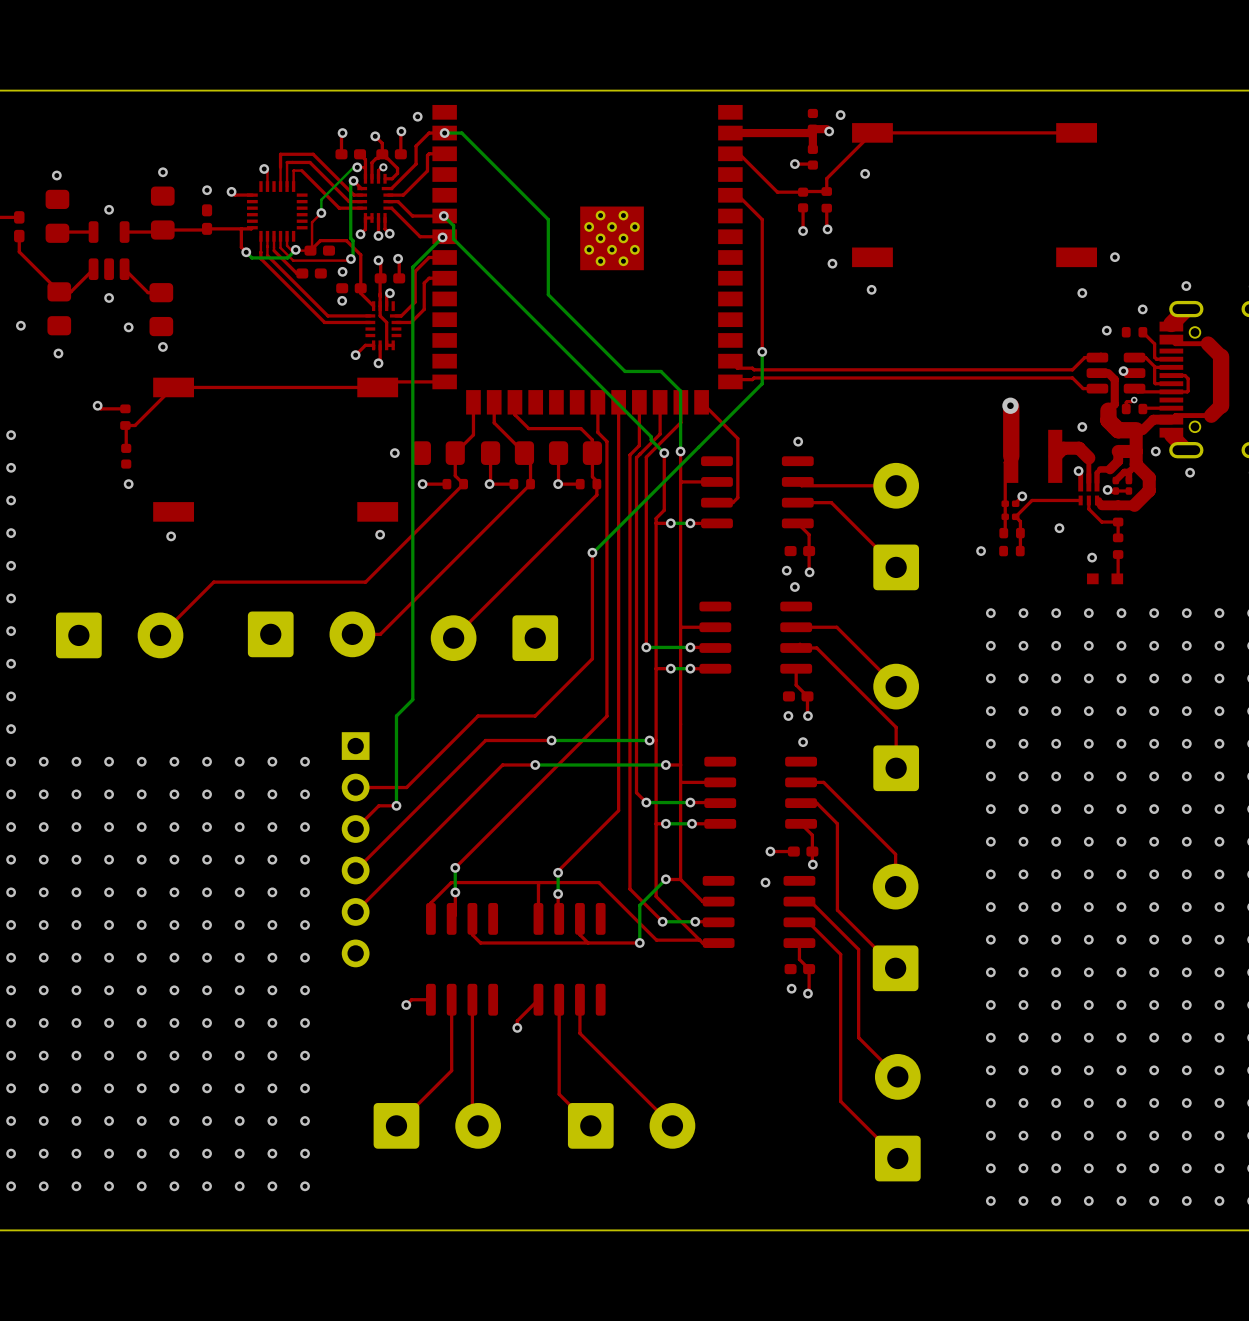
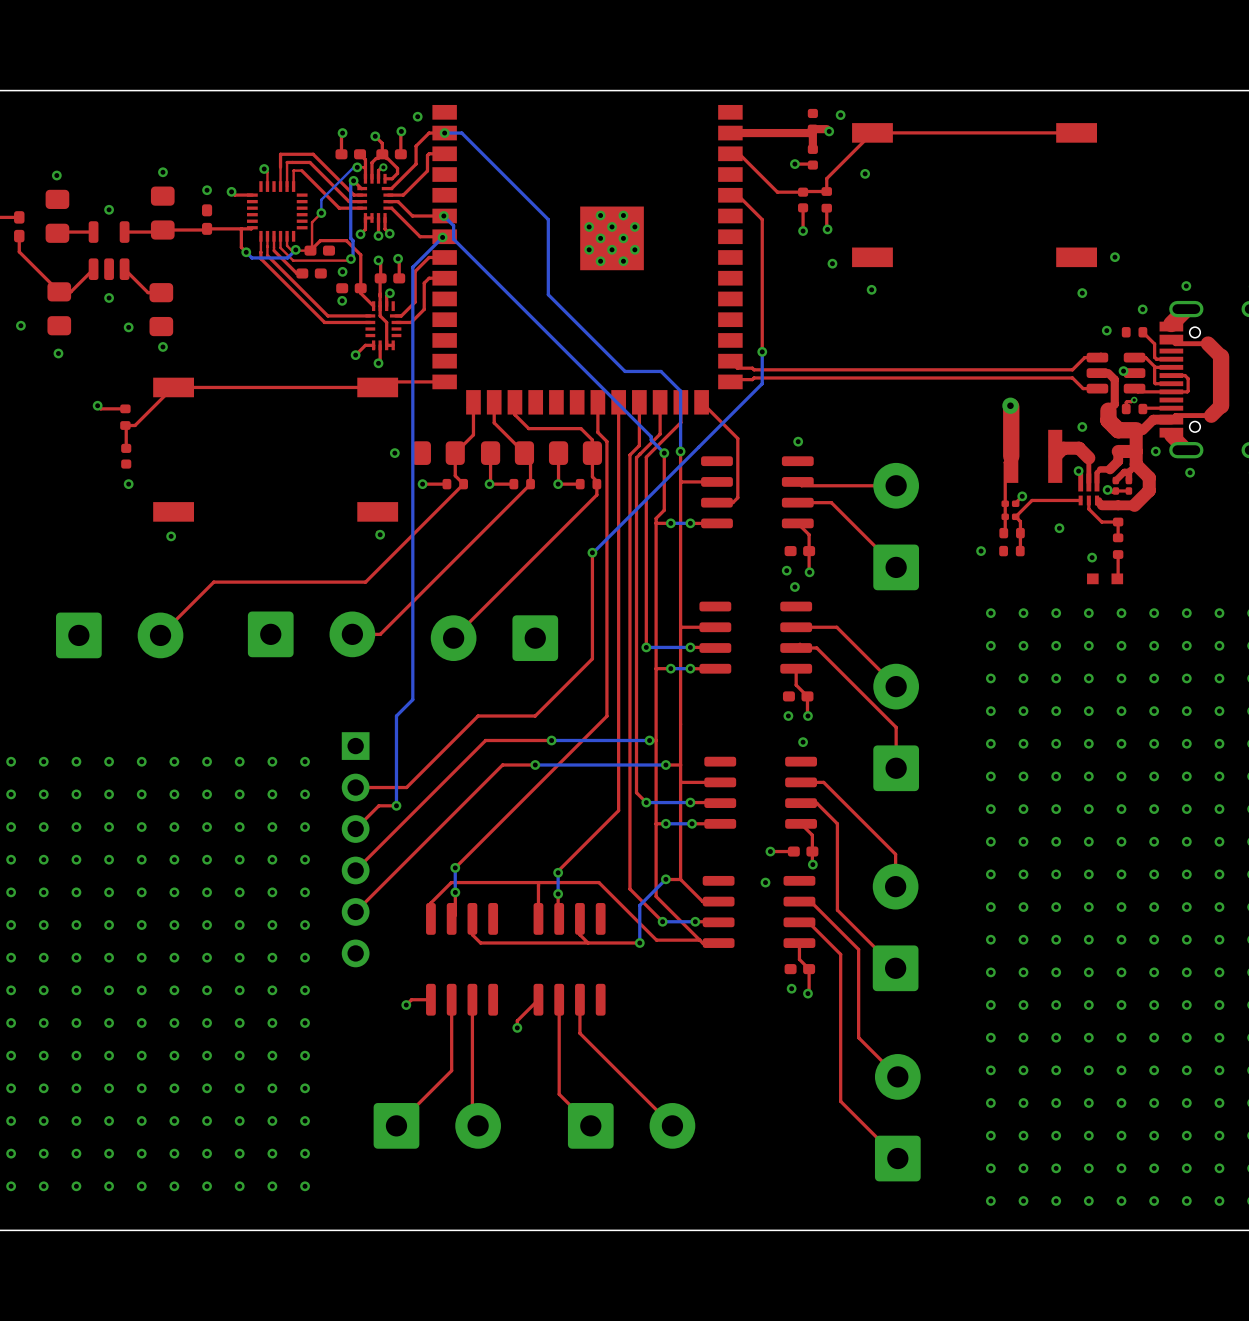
via: (11, 435) -> none
via: (11, 467) -> none
via: (11, 500) -> none
via: (11, 533) -> none
via: (11, 565) -> none
via: (11, 598) -> none
via: (11, 631) -> none
via: (11, 663) -> none
via: (11, 696) -> none
via: (11, 729) -> none

